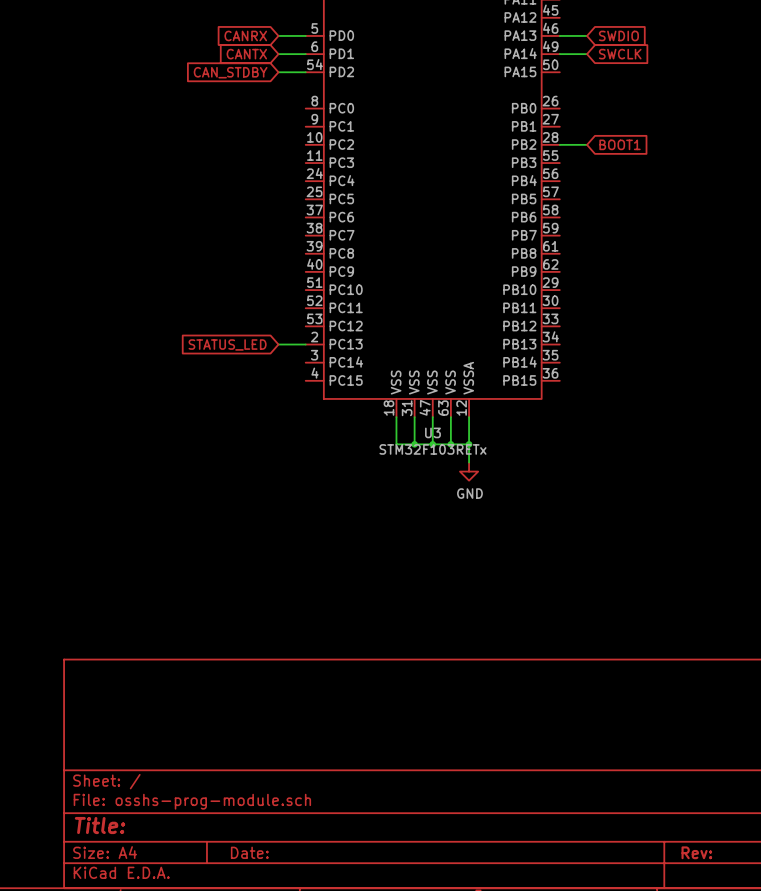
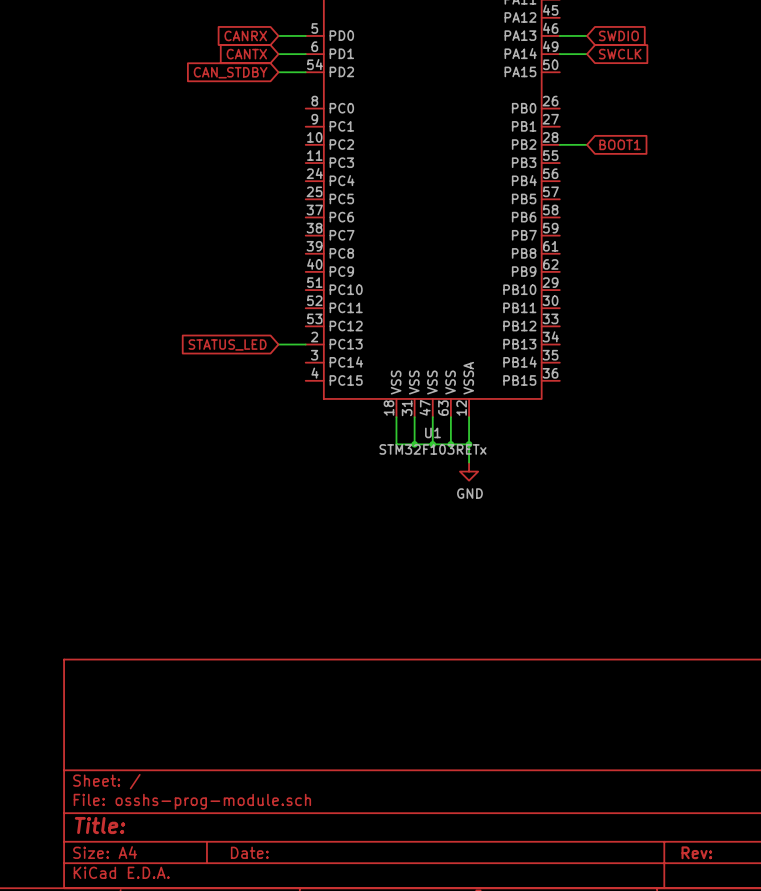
U3 name: U3 (432, 432) -> U1 (432, 432)

